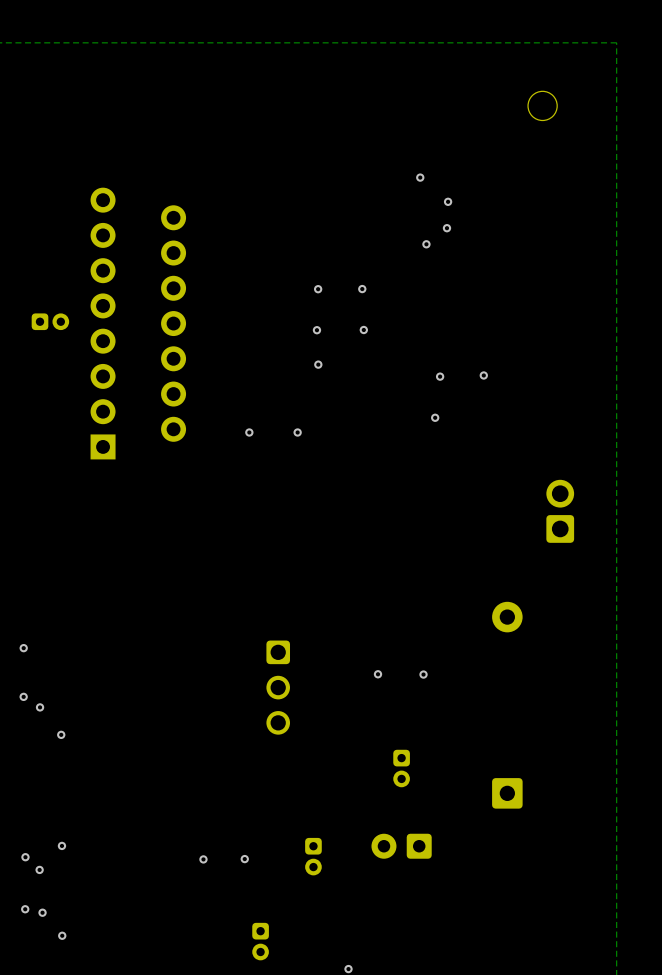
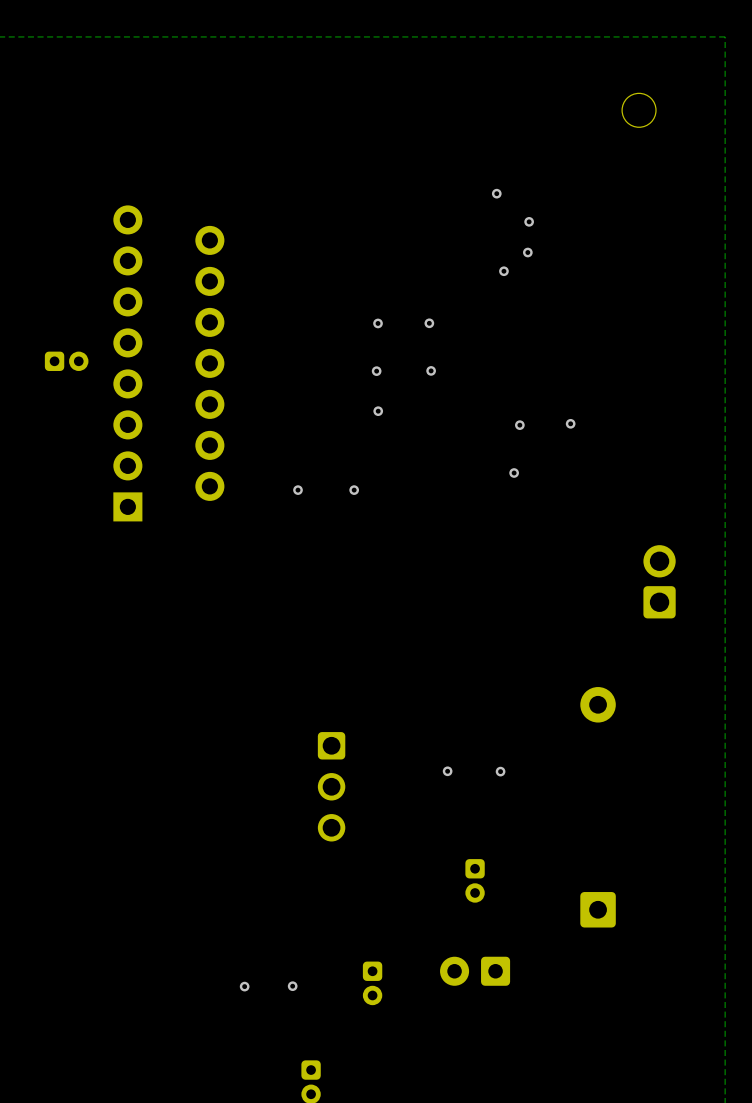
via: (23, 648) -> none
via: (23, 696) -> none
via: (40, 707) -> none
via: (61, 734) -> none
via: (61, 845) -> none
via: (25, 857) -> none
via: (39, 869) -> none
via: (25, 909) -> none
via: (42, 912) -> none
via: (62, 935) -> none

